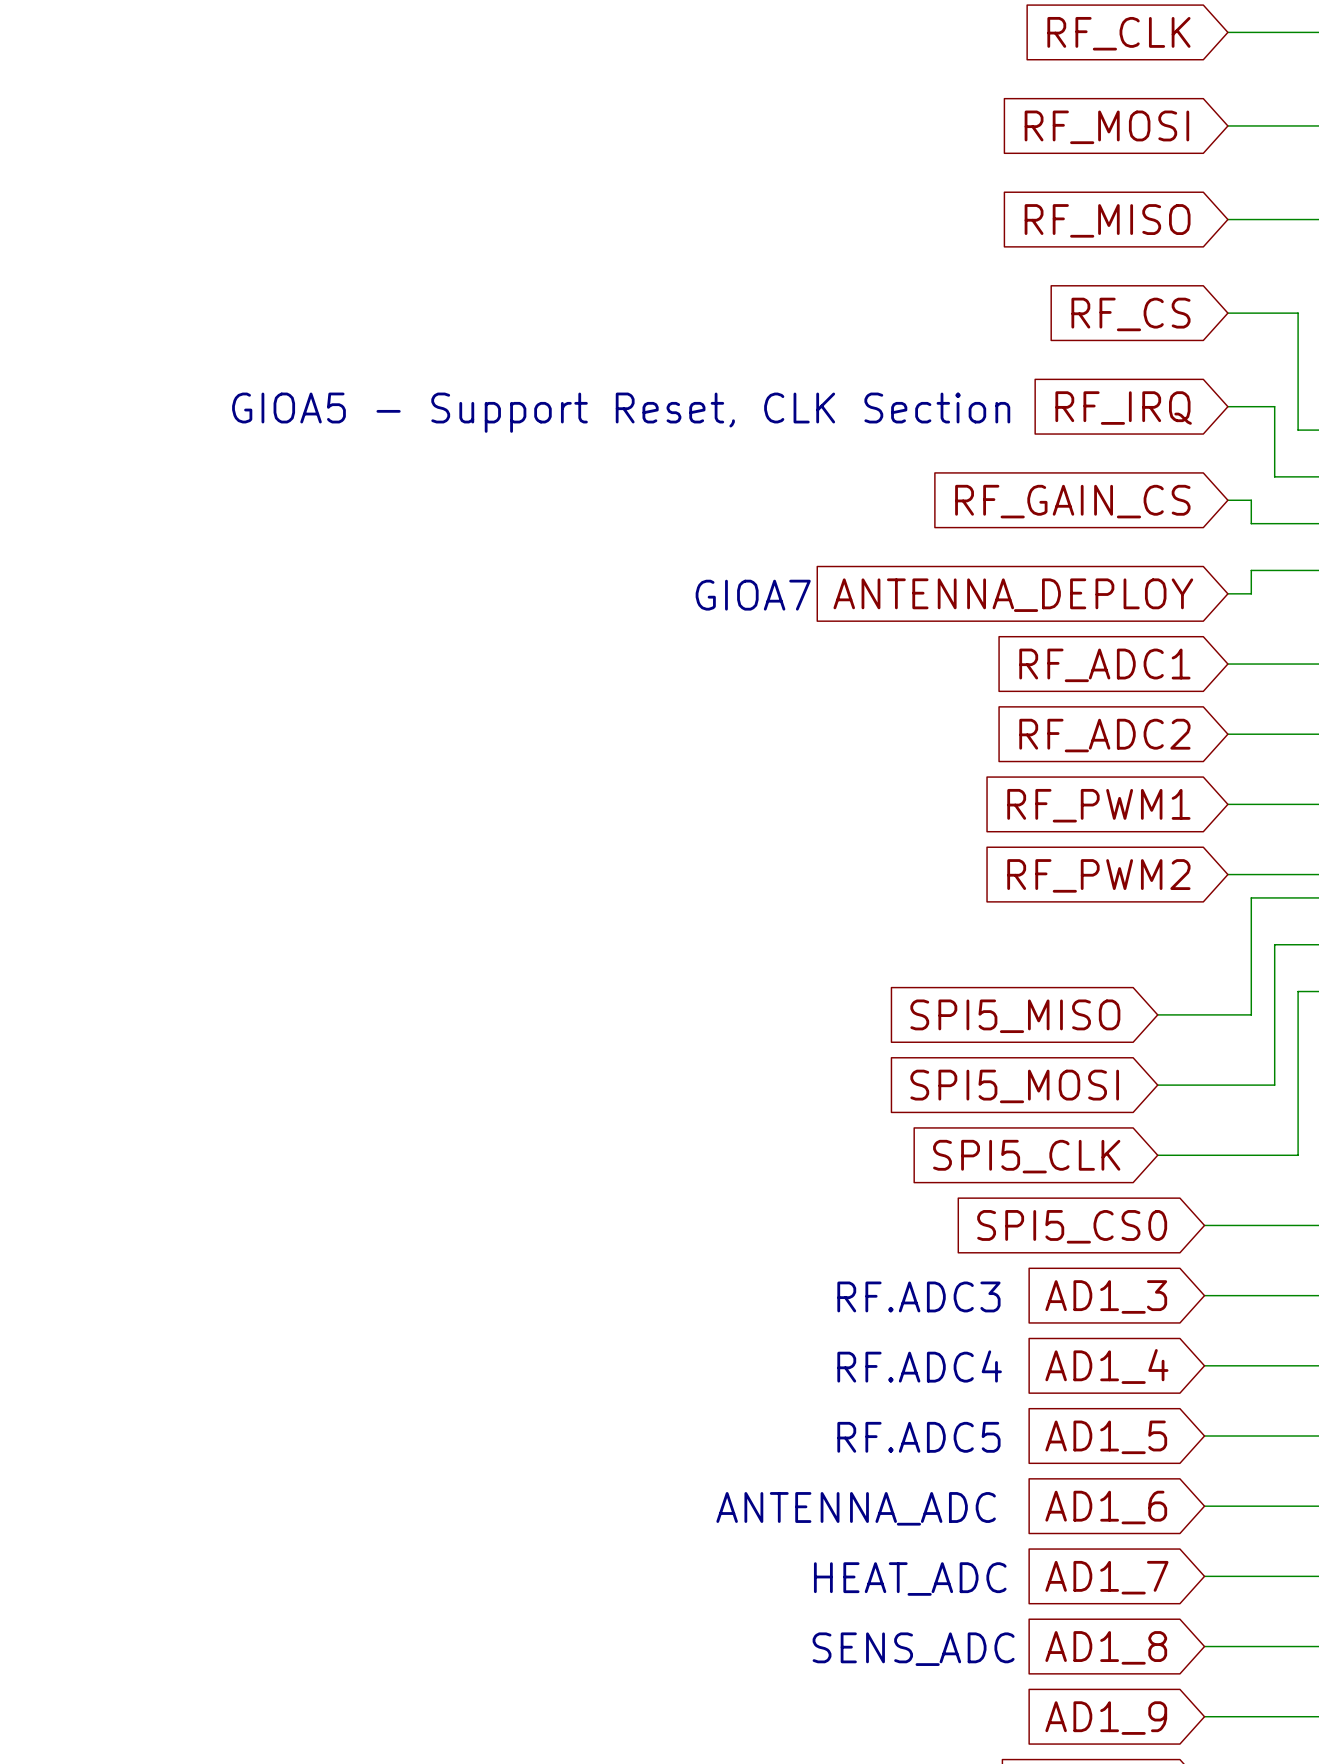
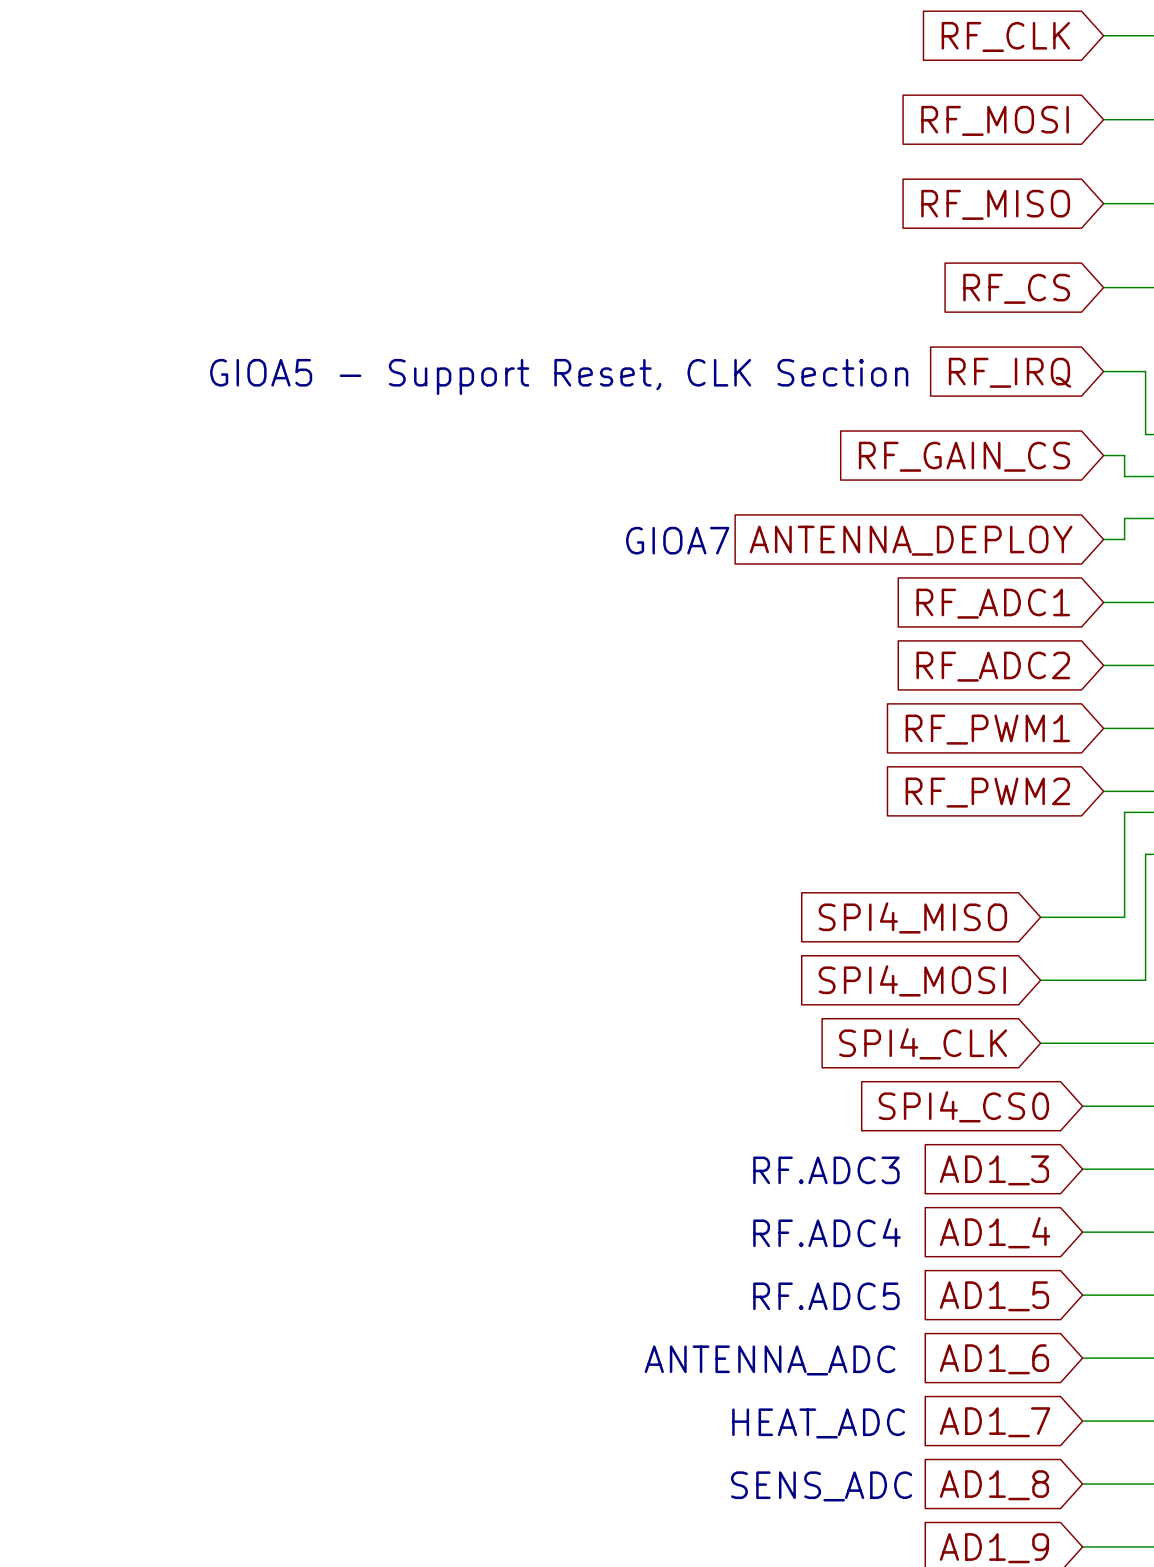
global label: SPI5_MISO (1015, 1016) -> SPI4_MISO (912, 917)
global label: SPI5_MOSI (1014, 1086) -> SPI4_MOSI (912, 980)
global label: SPI5_CLK (1026, 1156) -> SPI4_CLK (923, 1043)
global label: SPI5_CS0 (1072, 1226) -> SPI4_CS0 (963, 1106)

